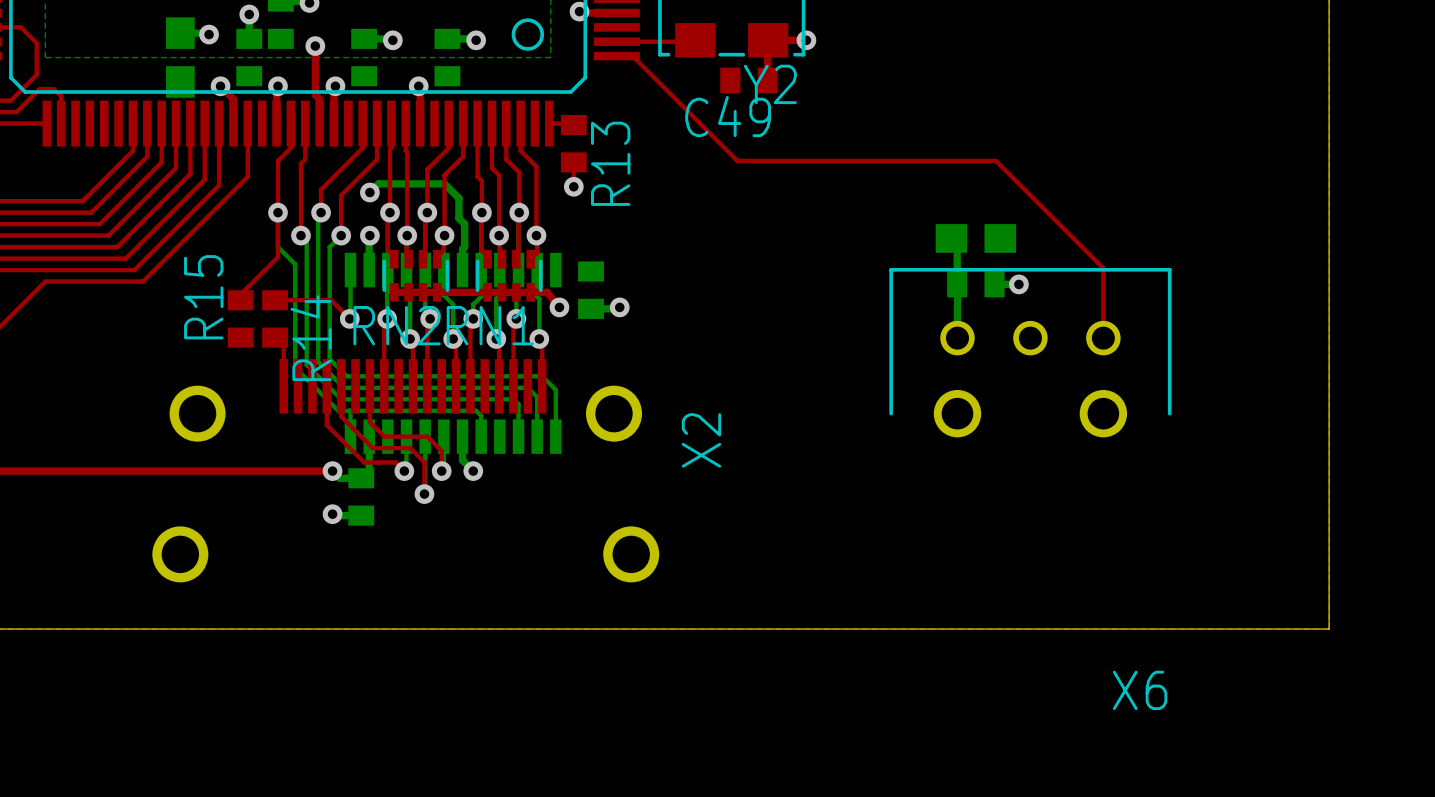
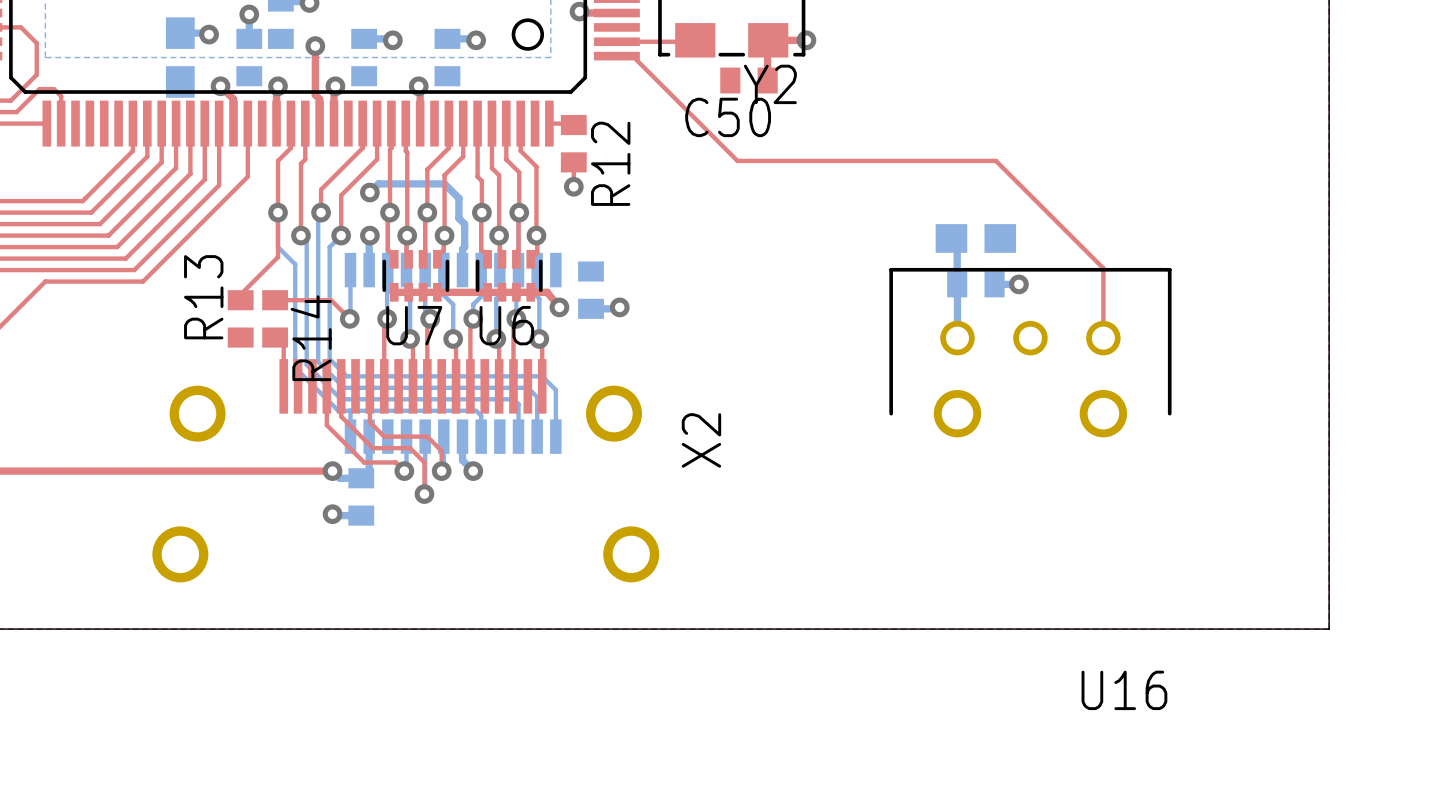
C49 name: C49 (728, 116) -> C50 (728, 117)
R13 name: R13 (610, 163) -> R12 (610, 163)
R15 name: R15 (203, 297) -> R13 (203, 297)
RN2 name: RN2 (397, 325) -> U7 (414, 325)
RN1 name: RN1 (490, 325) -> U6 (506, 325)
X6 name: X6 (1140, 690) -> U16 (1124, 690)

